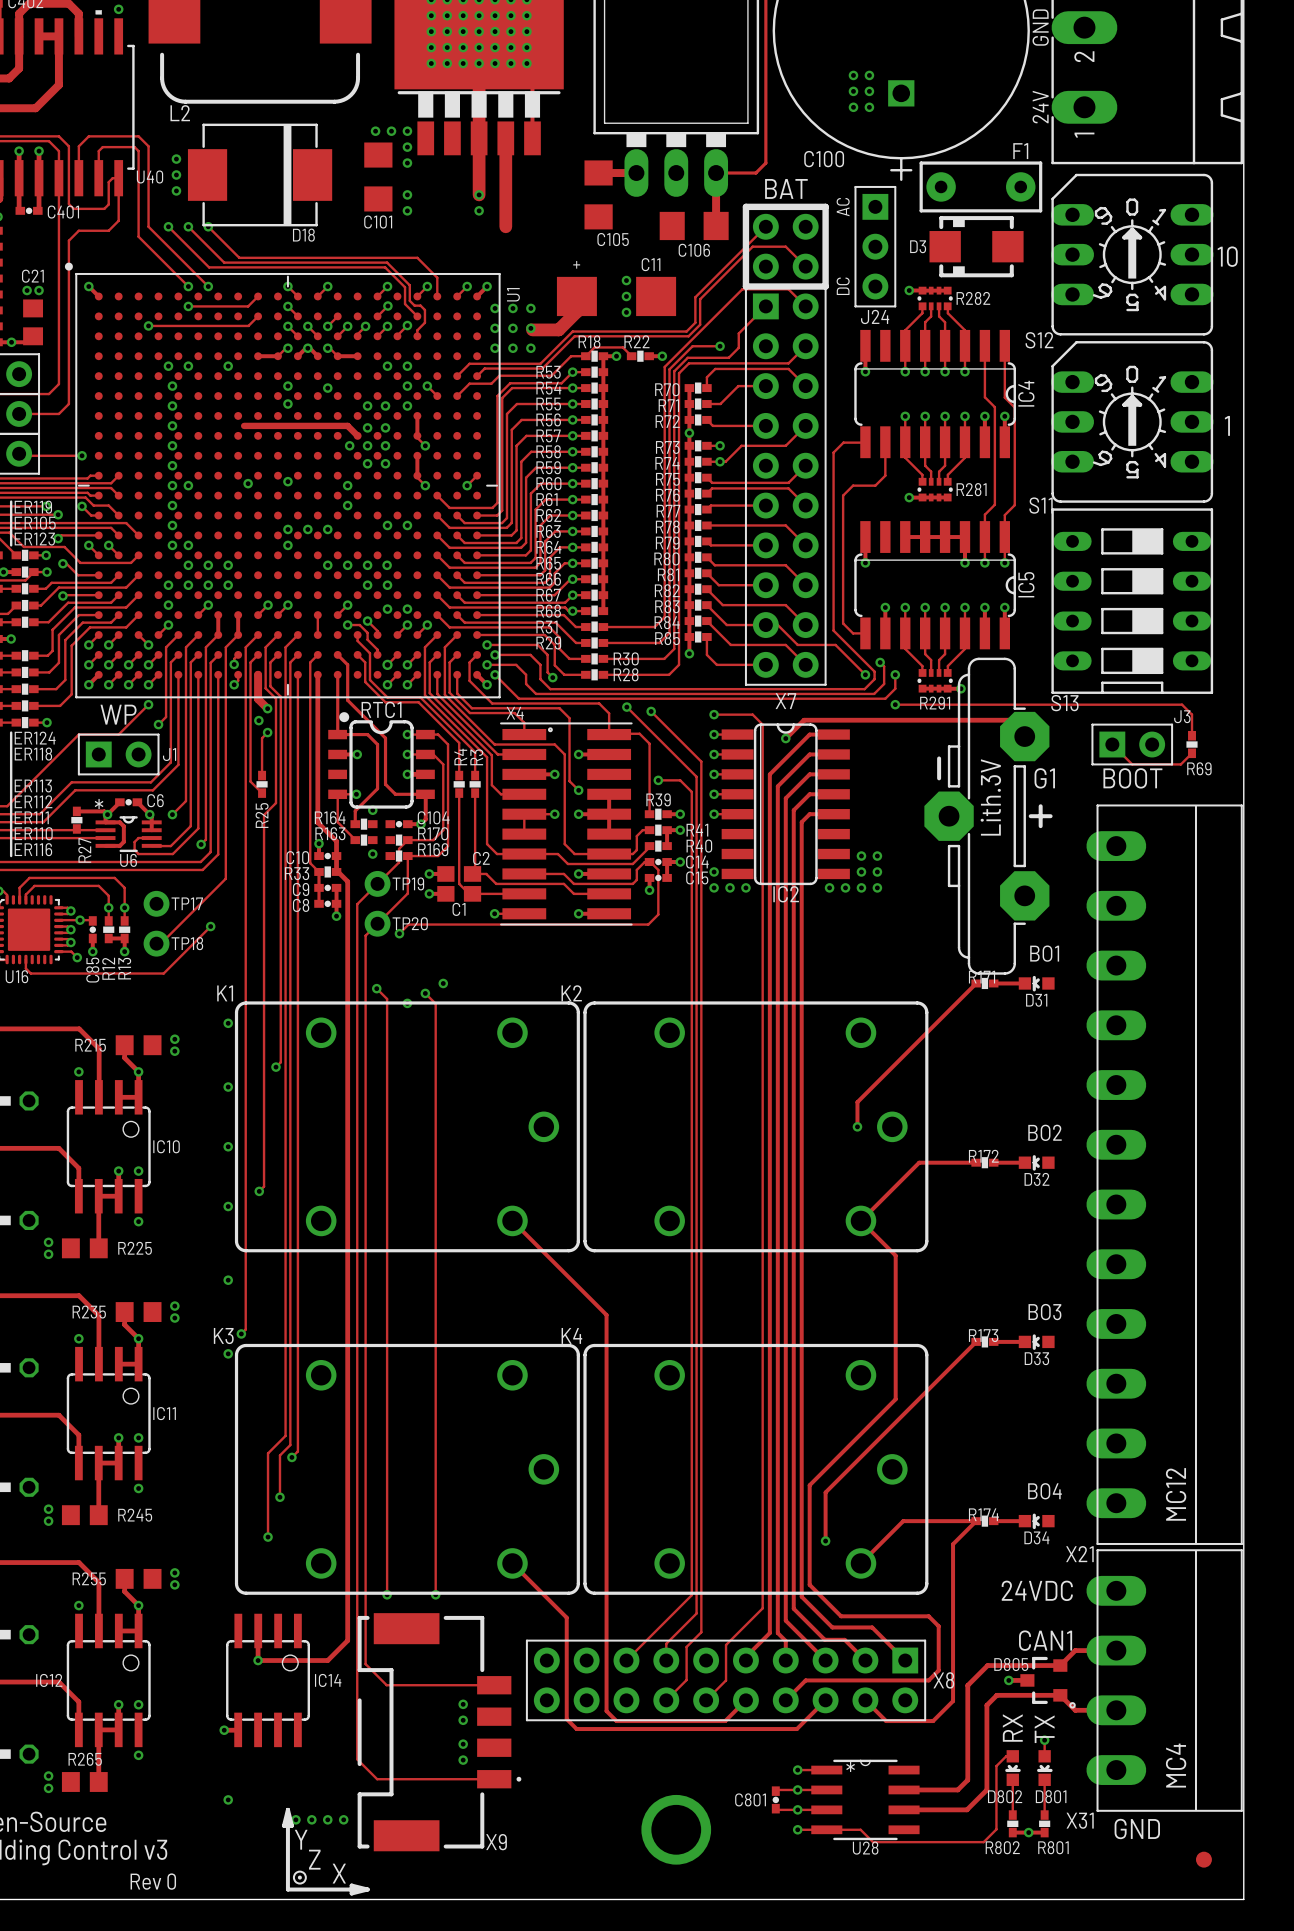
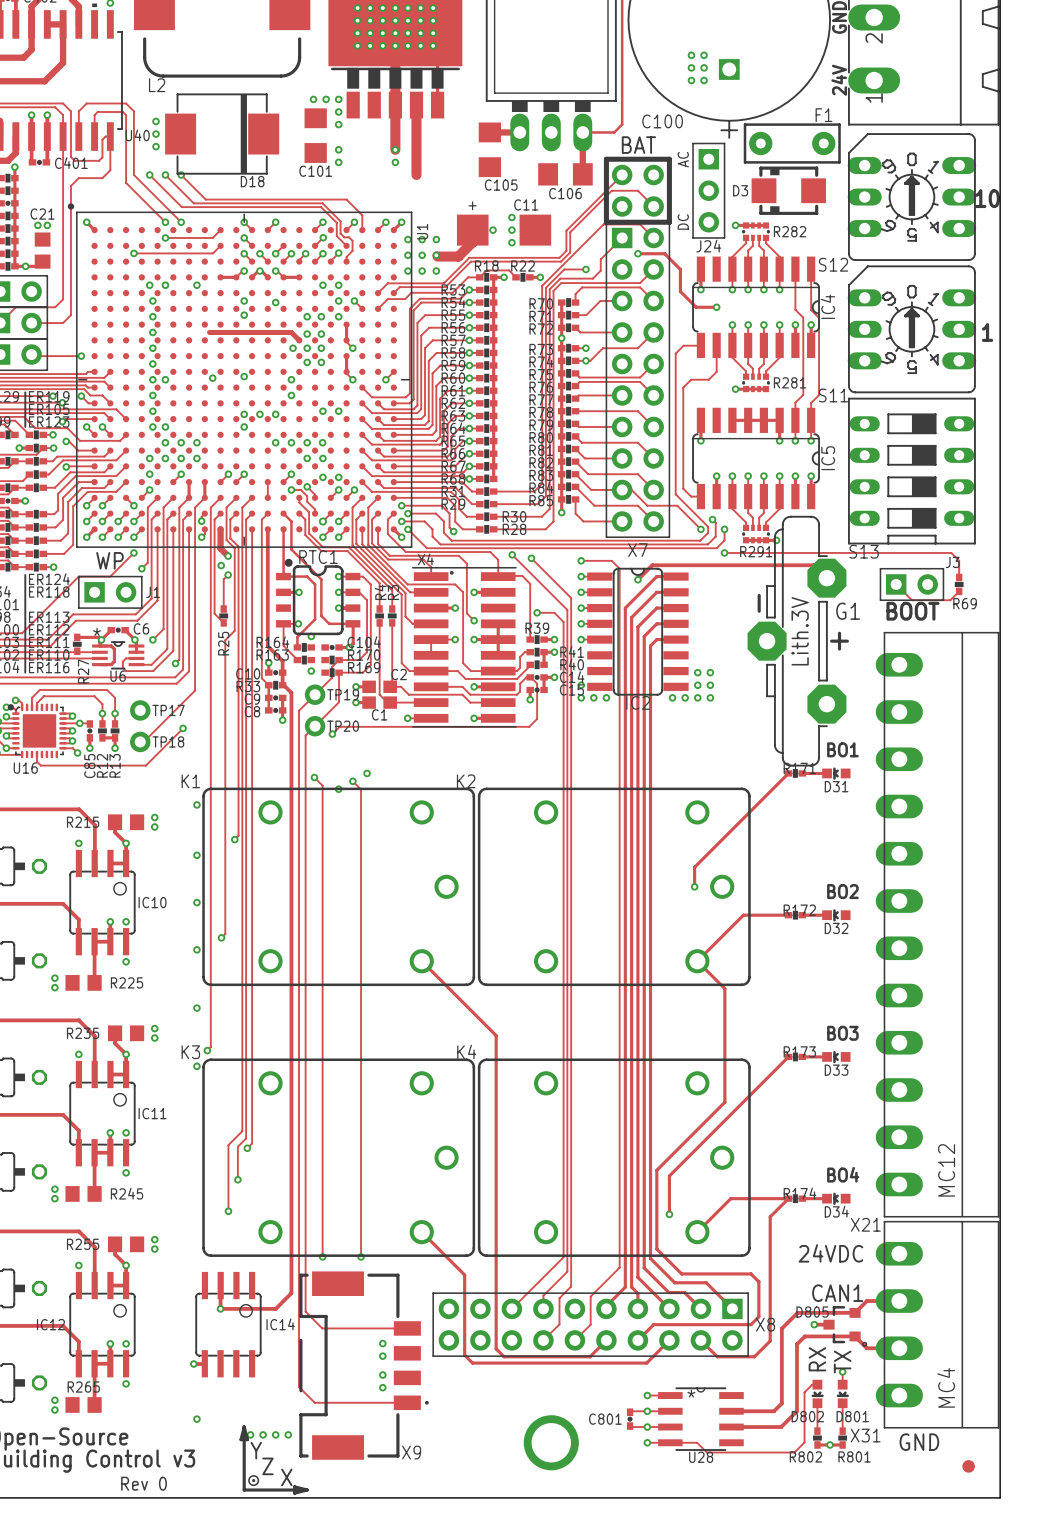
via: none -> (493, 230)
track: none -> (637, 253) (664, 253) (680, 269) (680, 291) (696, 307) (716, 307)
via: none -> (637, 253)
via: none -> (716, 307)

